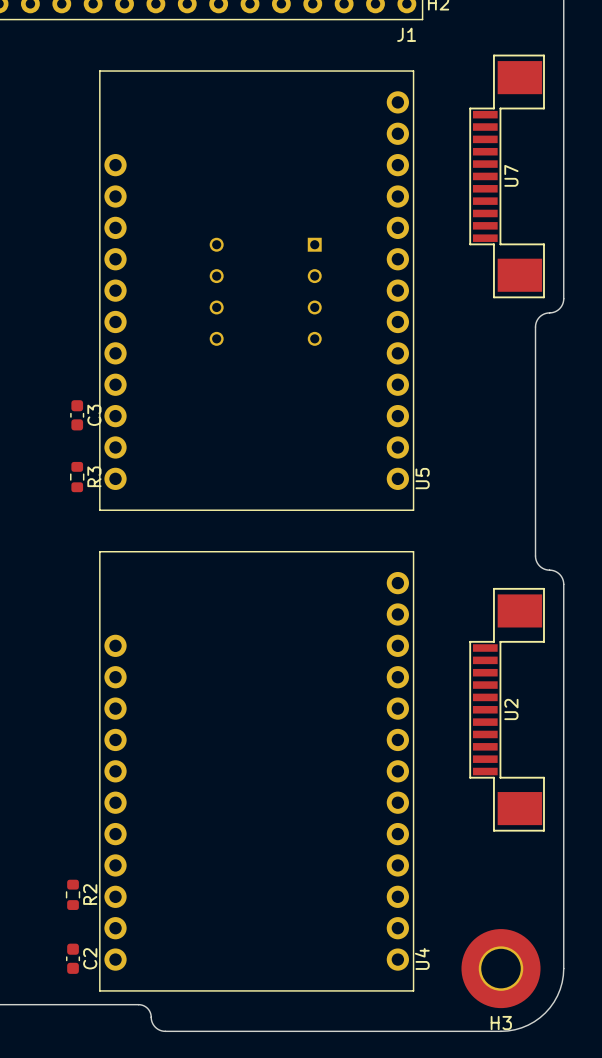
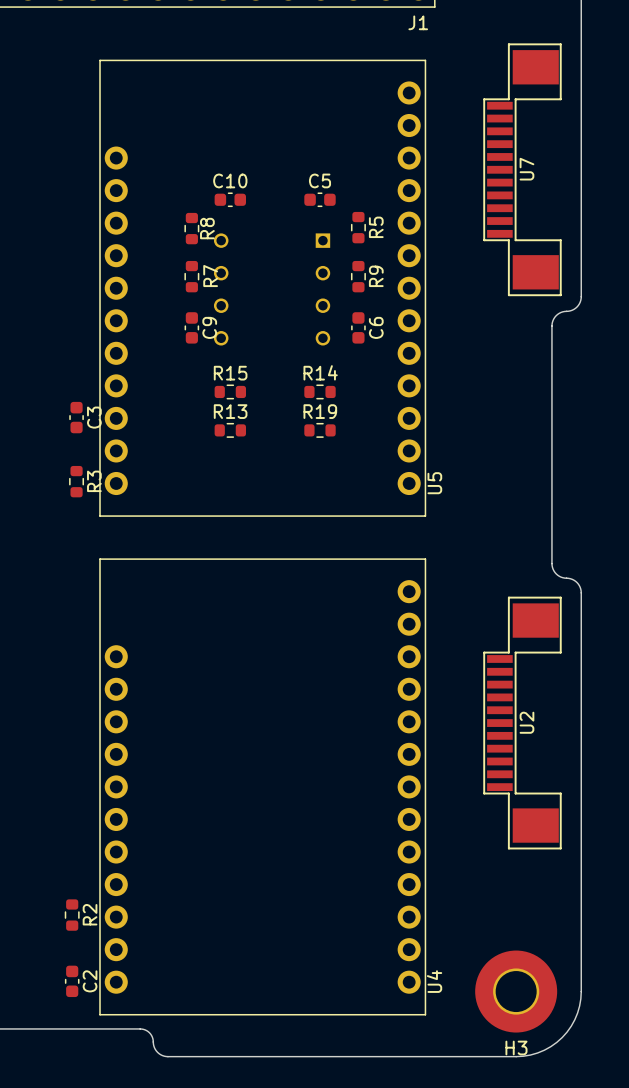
C10: none -> (230, 199)
C5: none -> (320, 199)
R5: none -> (358, 227)
R8: none -> (191, 228)
R7: none -> (191, 276)
R9: none -> (358, 276)
C9: none -> (191, 327)
C6: none -> (358, 327)
R15: none -> (230, 391)
R14: none -> (320, 391)
R13: none -> (230, 430)
R19: none -> (320, 430)

